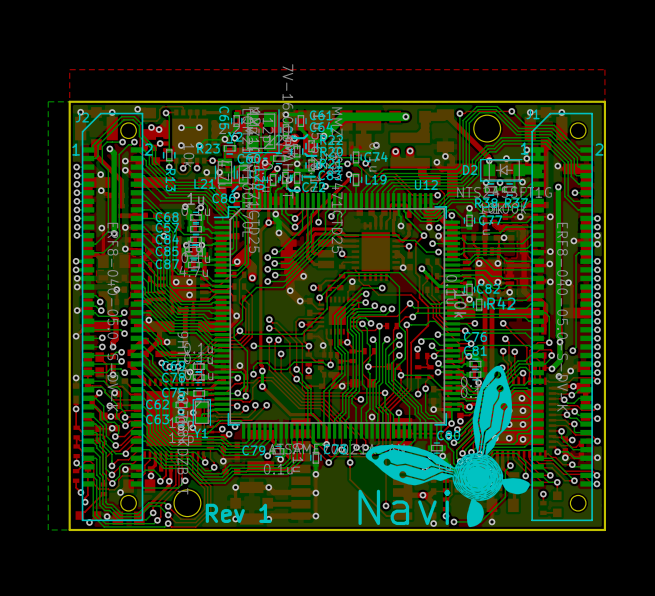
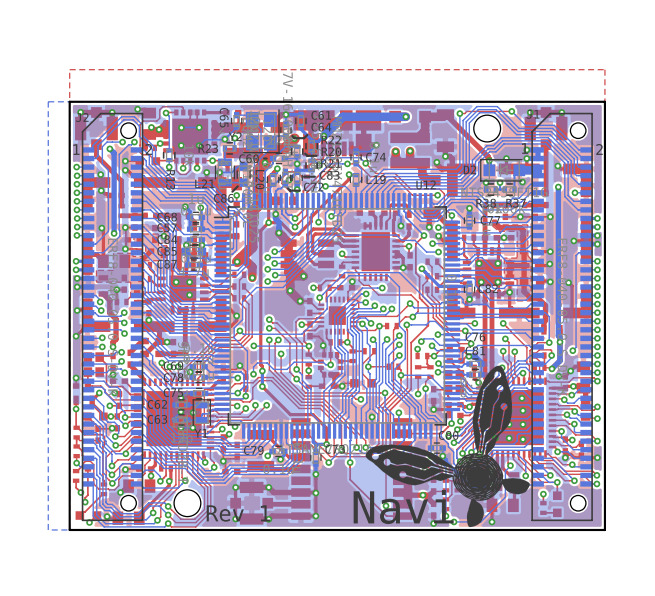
bottom track: (469, 283) (479, 293) (479, 300) -> none
R42: 10k (479, 304) -> none
bottom track: (451, 307) (479, 310) -> none

